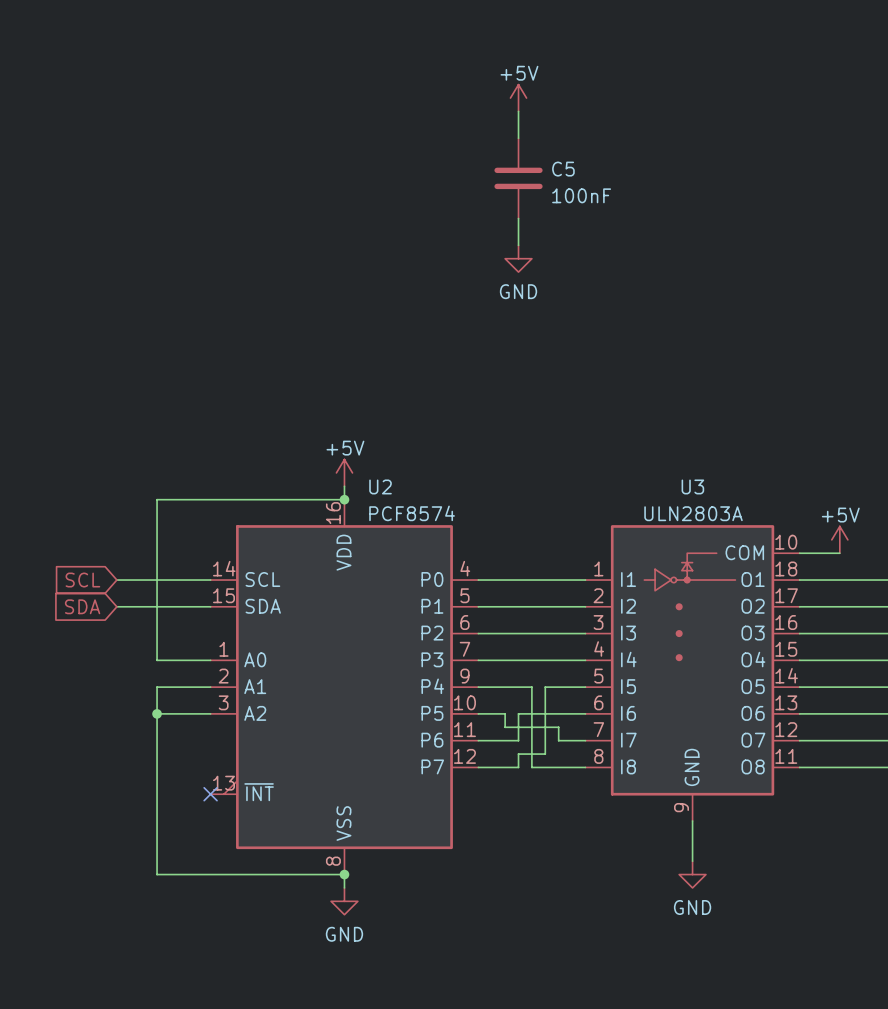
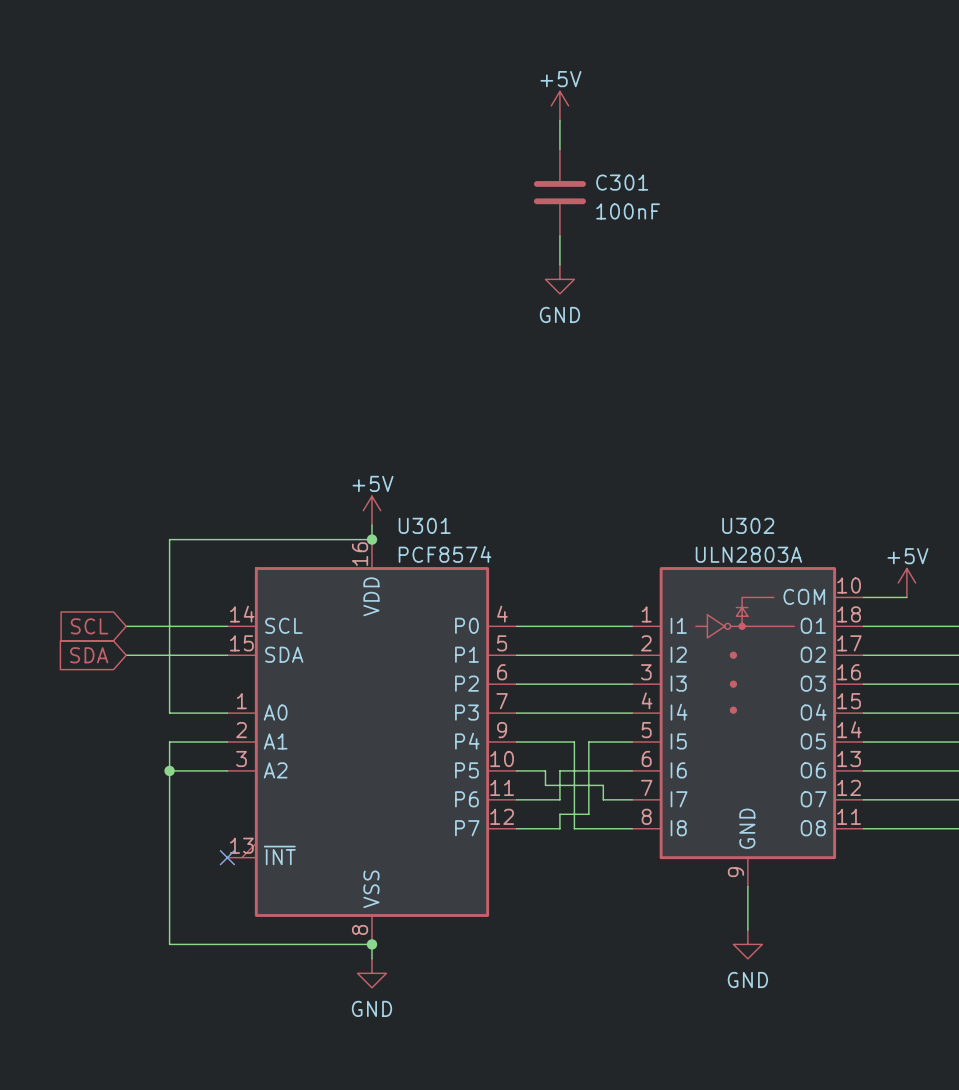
C5 name: C5 (563, 169) -> C301 (622, 182)
U2 name: U2 (380, 486) -> U301 (424, 525)
U3 name: U3 (692, 486) -> U302 (748, 525)

